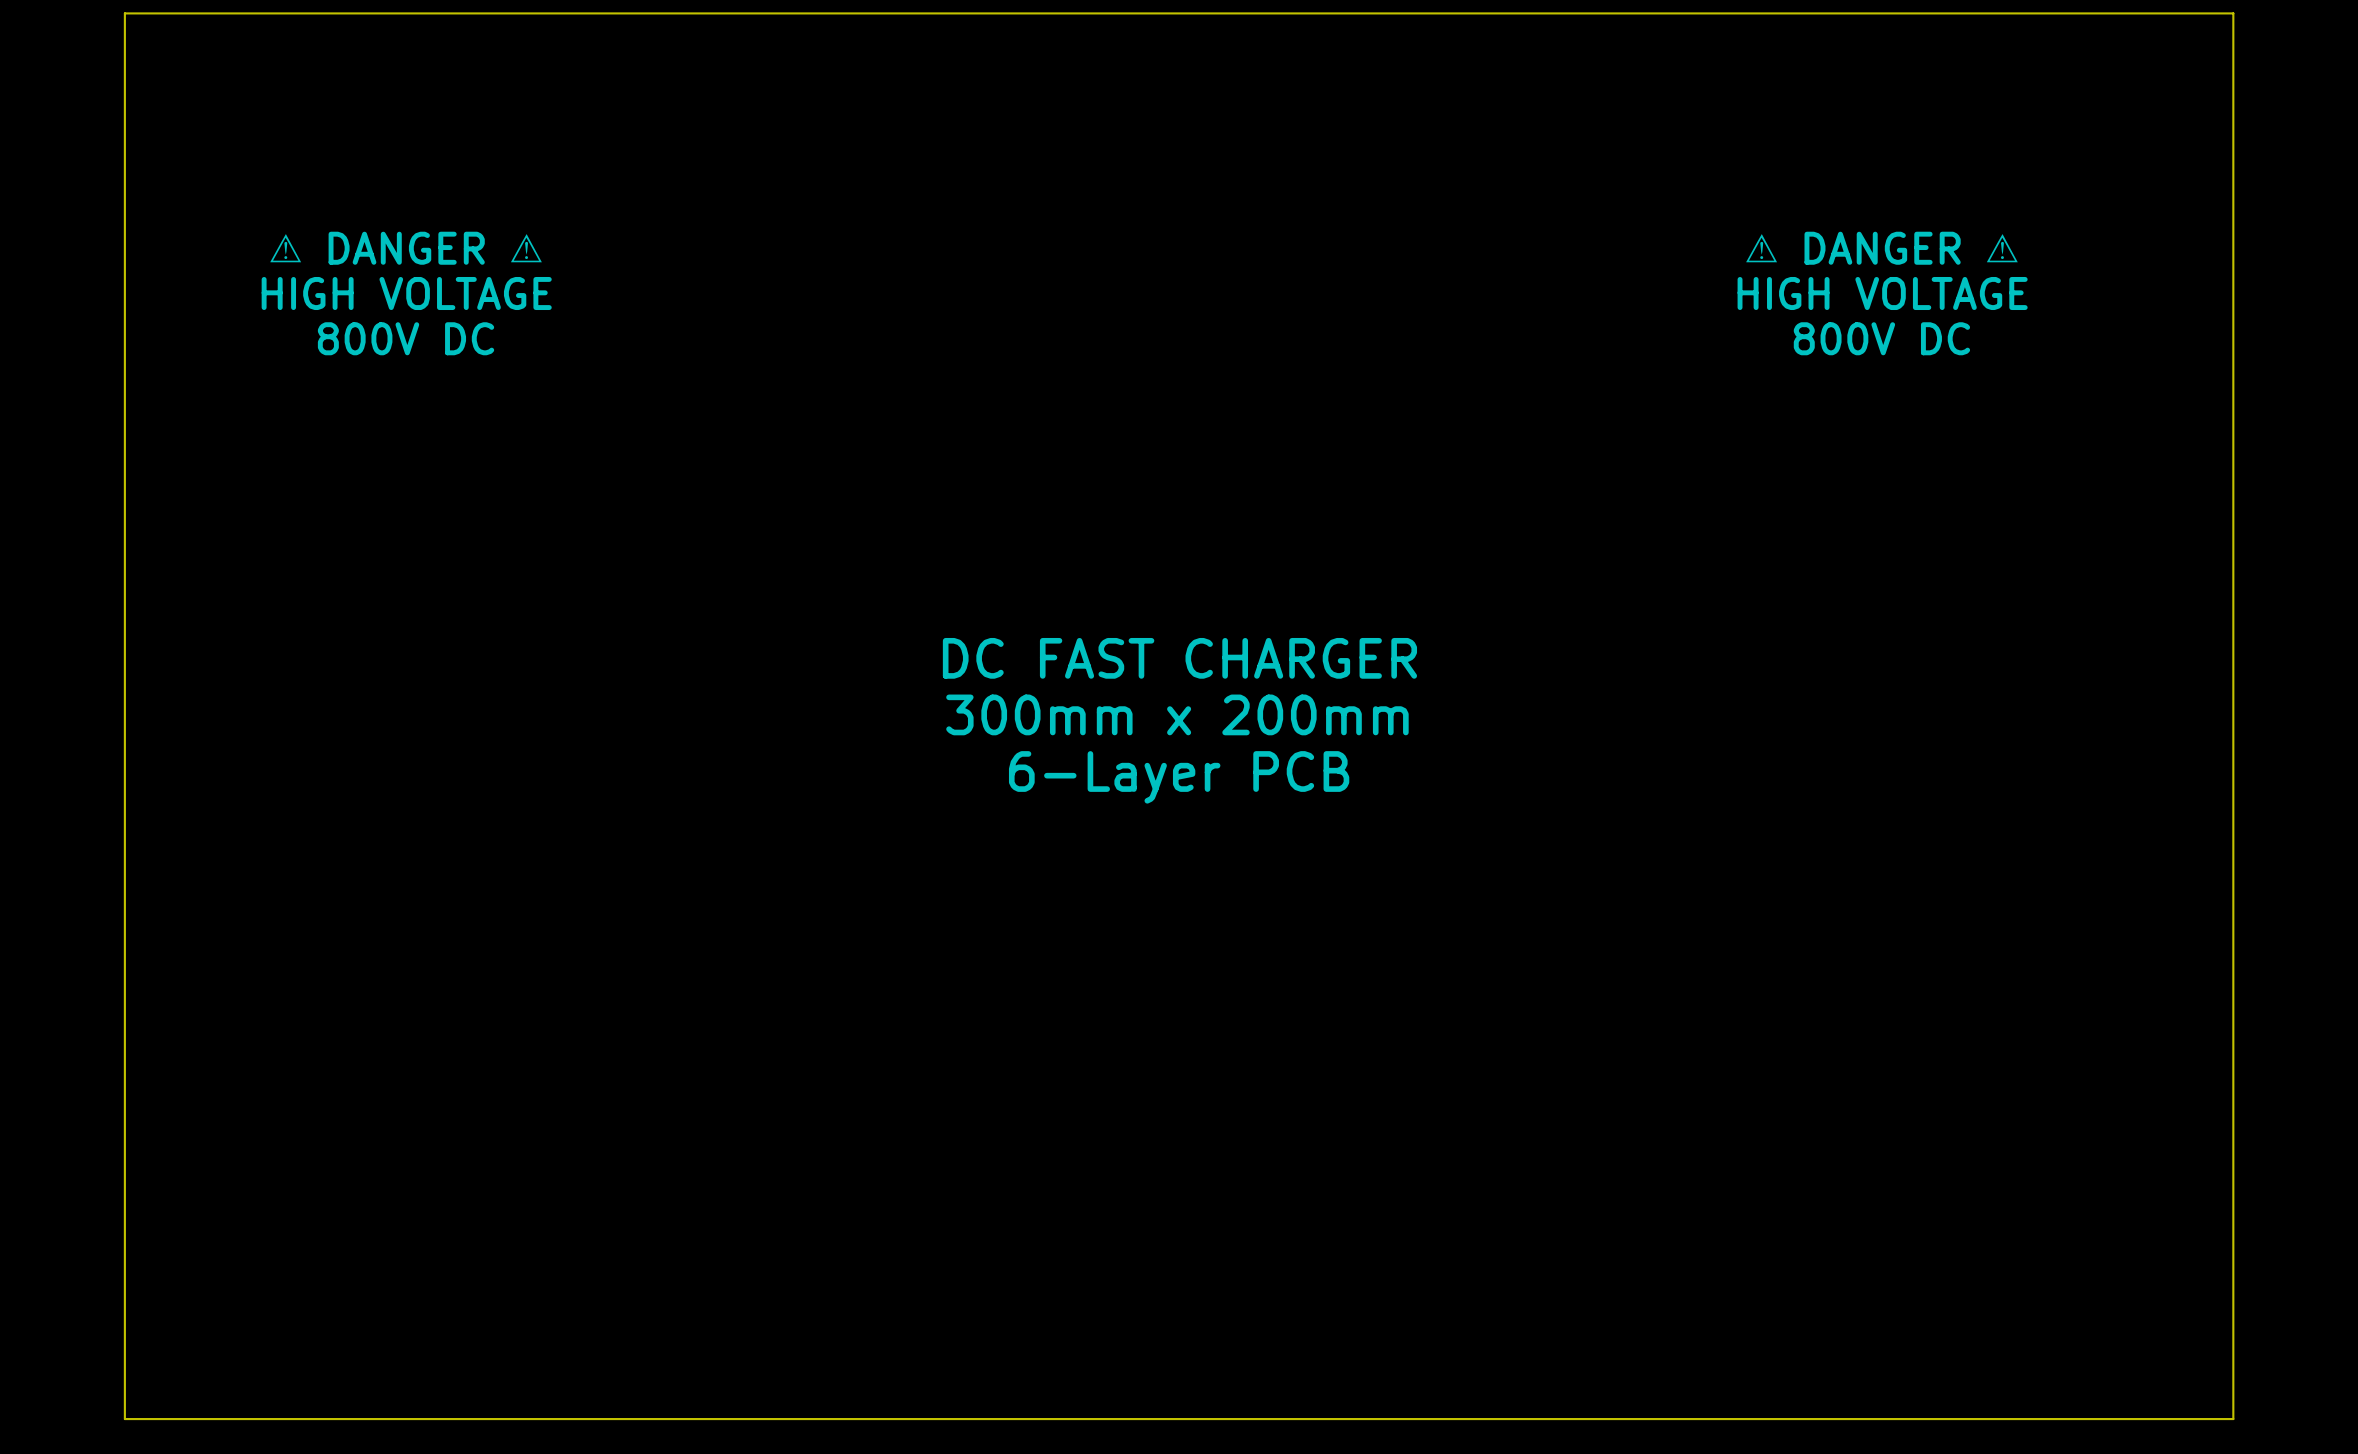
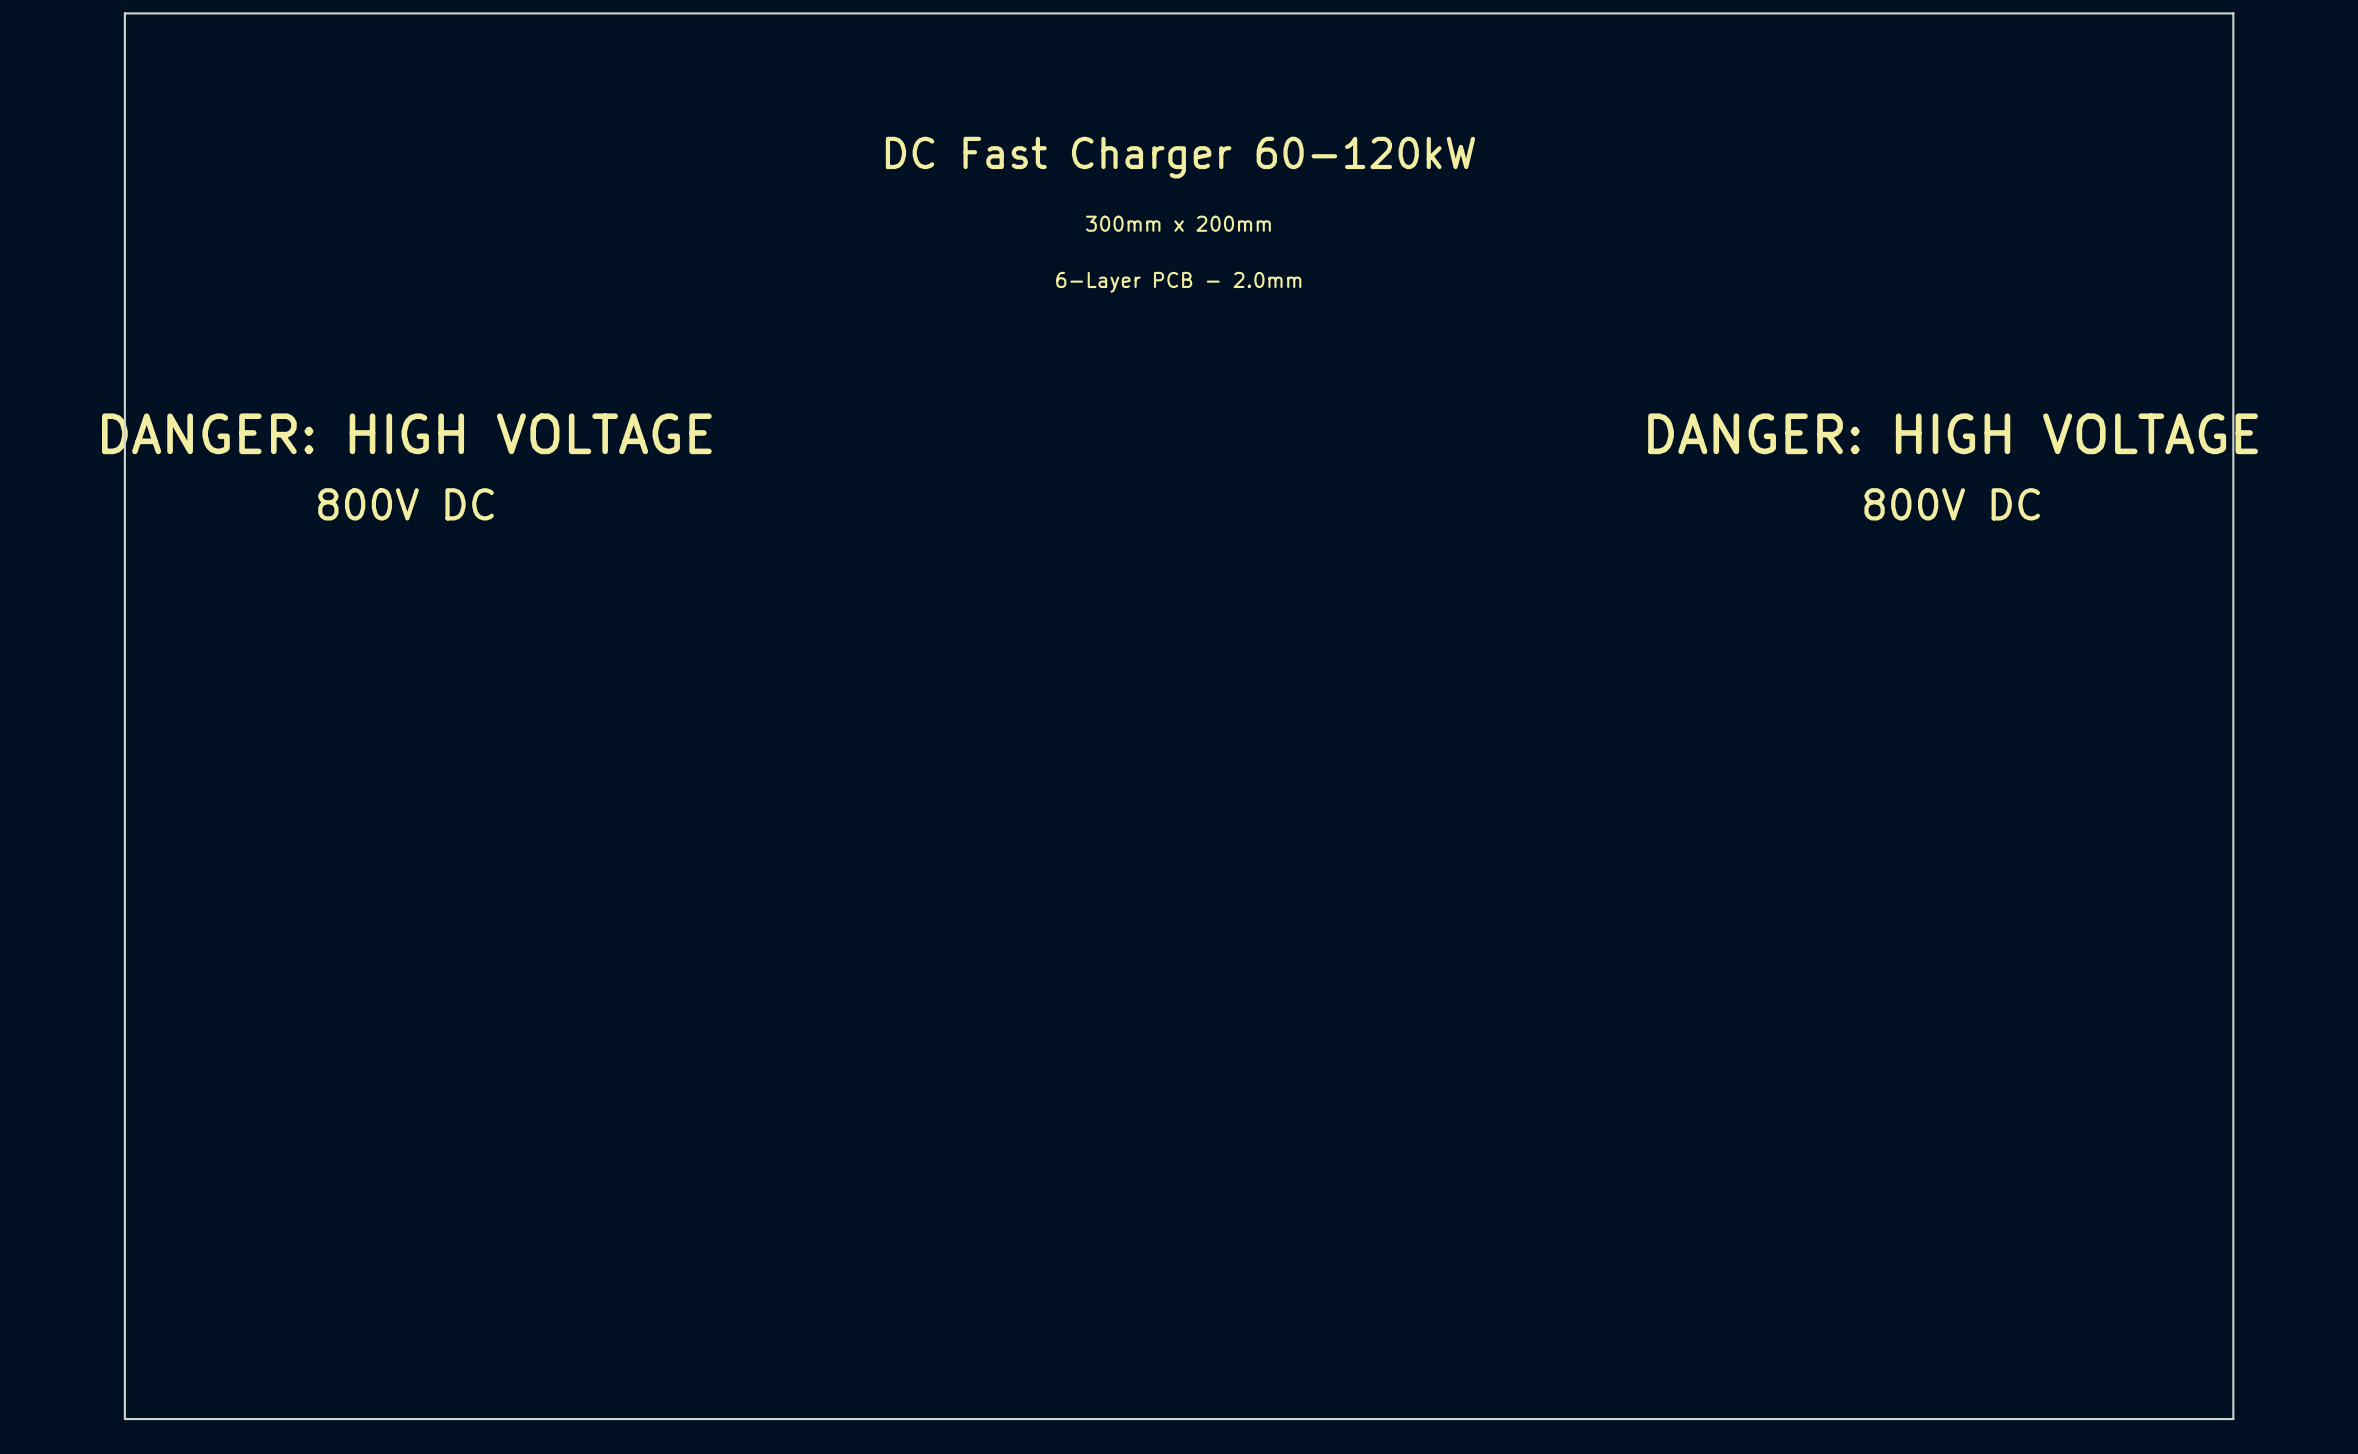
text: none -> DC Fast Charger 60-120kW (1180, 157)
text: none -> 300mm x 200mm (1178, 223)
text: ⚠ DANGER ⚠ (406, 248) -> none
text: ⚠ DANGER ⚠ (1881, 248) -> none
text: none -> 6-Layer PCB - 2.0mm (1178, 282)
text: HIGH VOLTAGE (406, 293) -> none
text: HIGH VOLTAGE (1882, 293) -> none
text position: 800V DC (406, 338) -> 800V DC (406, 504)
text: 800V DC (1881, 338) -> none
text: none -> DANGER: HIGH VOLTAGE (406, 433)
text: none -> DANGER: HIGH VOLTAGE (1953, 433)
text: none -> 800V DC (1952, 504)
text: DC FAST CHARGER (1179, 658) -> none
text: 300mm x 200mm (1177, 714) -> none
text: 6-Layer PCB (1179, 777) -> none

